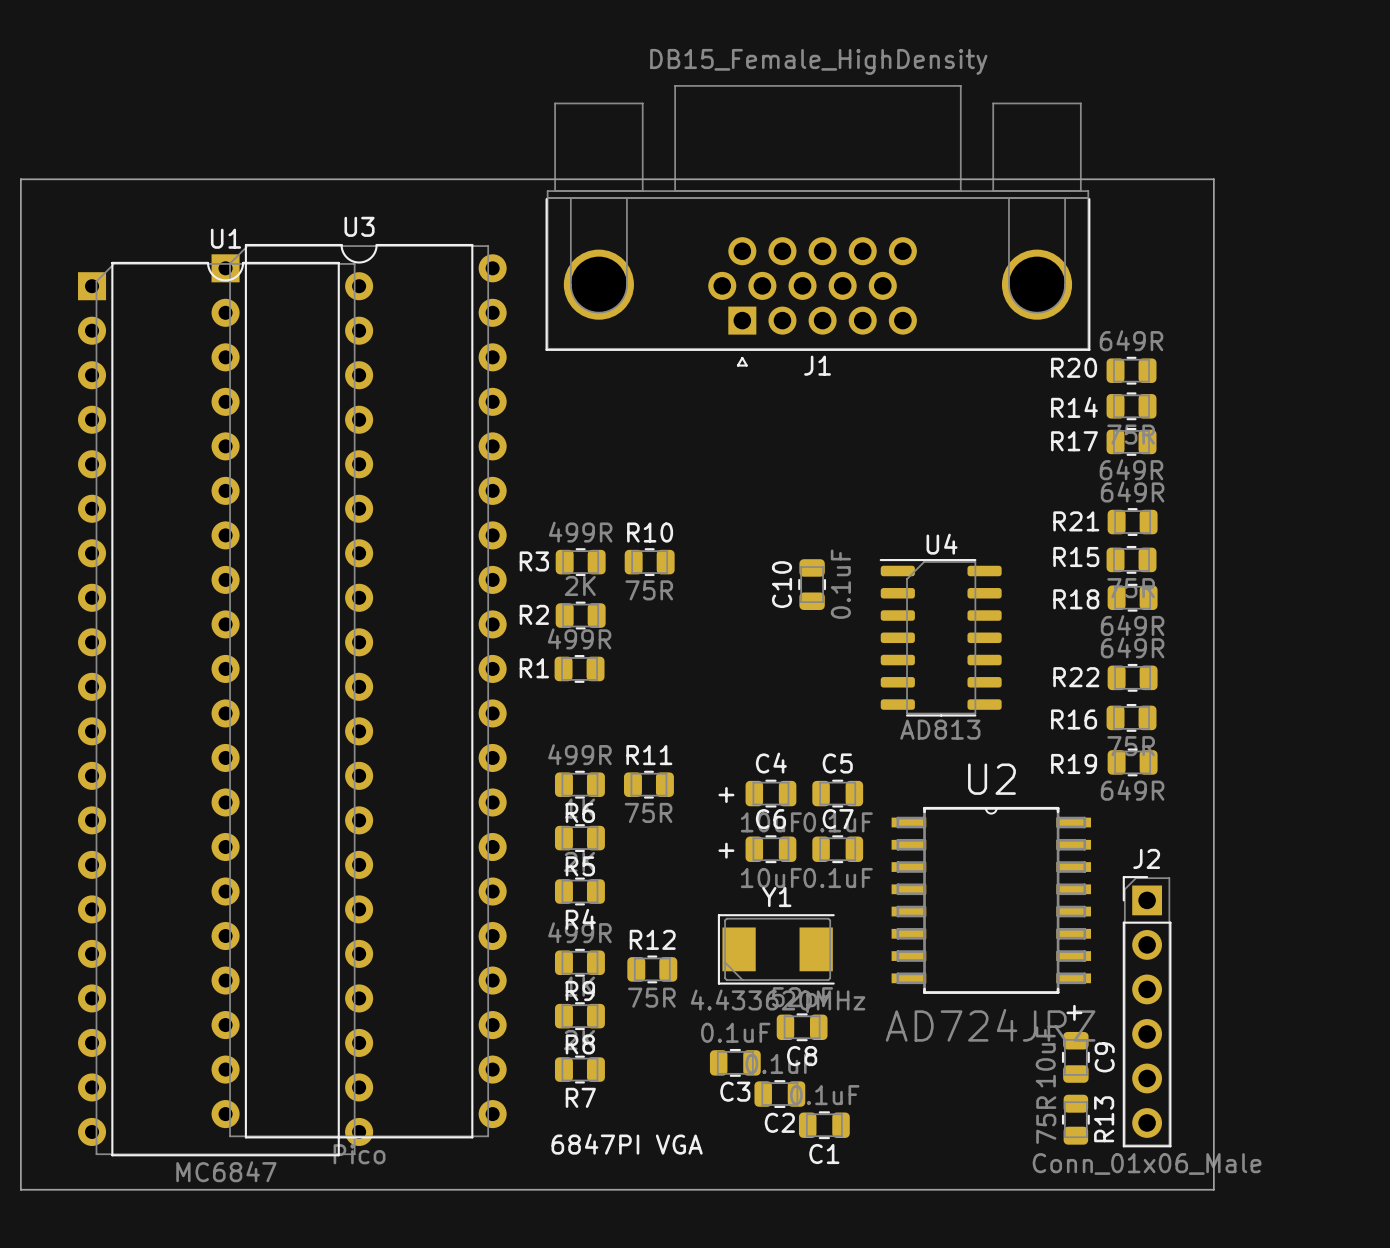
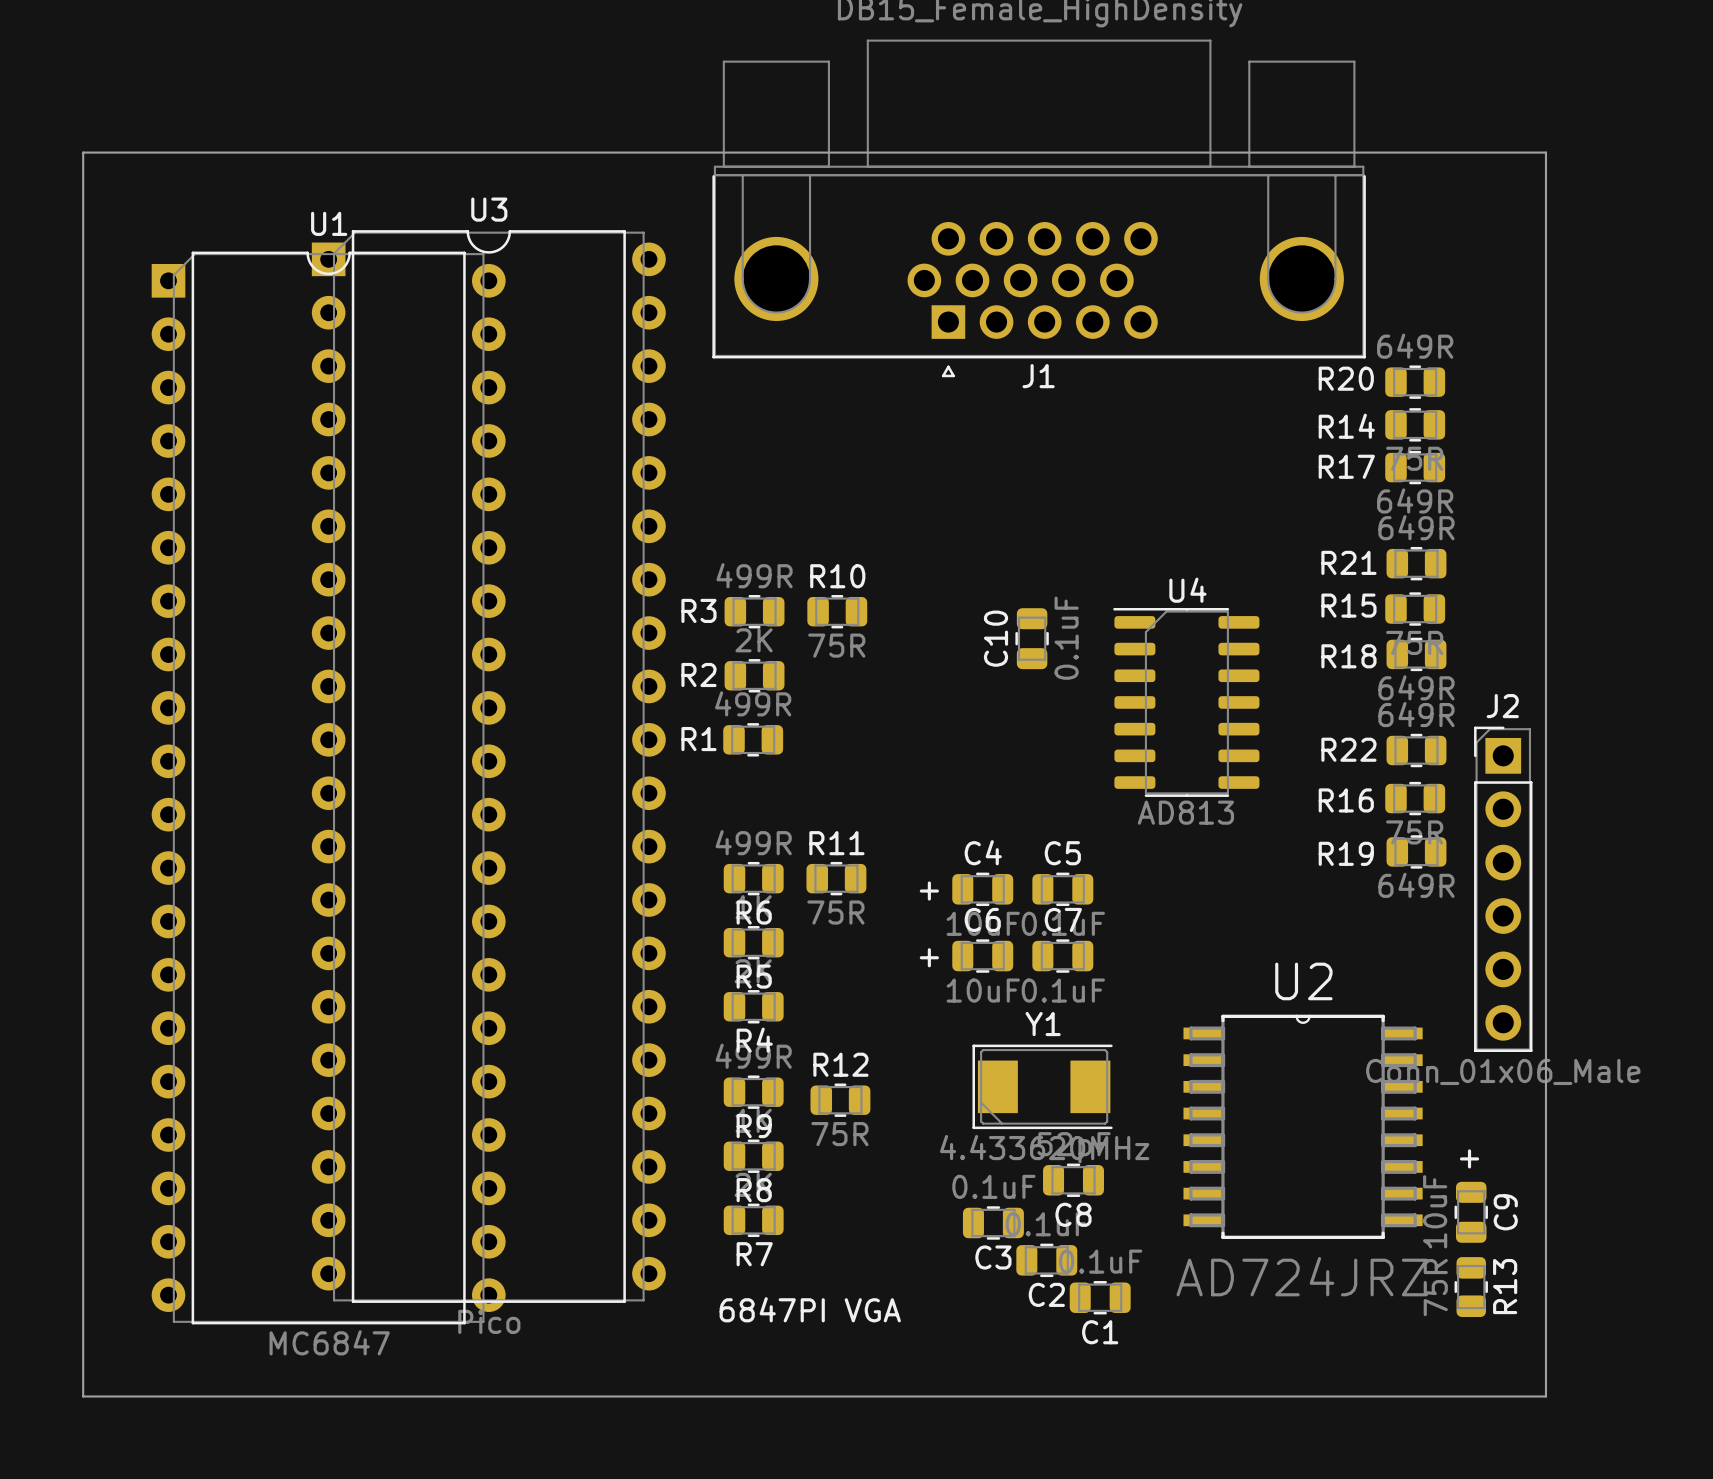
board edge: (1213, 179) (1213, 1189) (20, 1189) -> (1513, 152) (1545, 152) (1545, 1396) (83, 1396) (83, 1364)
U2 position: (991, 900) -> (1303, 1126)
Y1 position: (776, 949) -> (1042, 1086)
J2 position: (1147, 1011) -> (1503, 889)
C8 position: (802, 1027) -> (1073, 1180)
C9 position: (1075, 1057) -> (1471, 1212)
C3 position: (735, 1062) -> (993, 1222)
C2 position: (779, 1094) -> (1046, 1260)
R13 position: (1075, 1119) -> (1471, 1287)
C1 position: (824, 1125) -> (1100, 1297)

